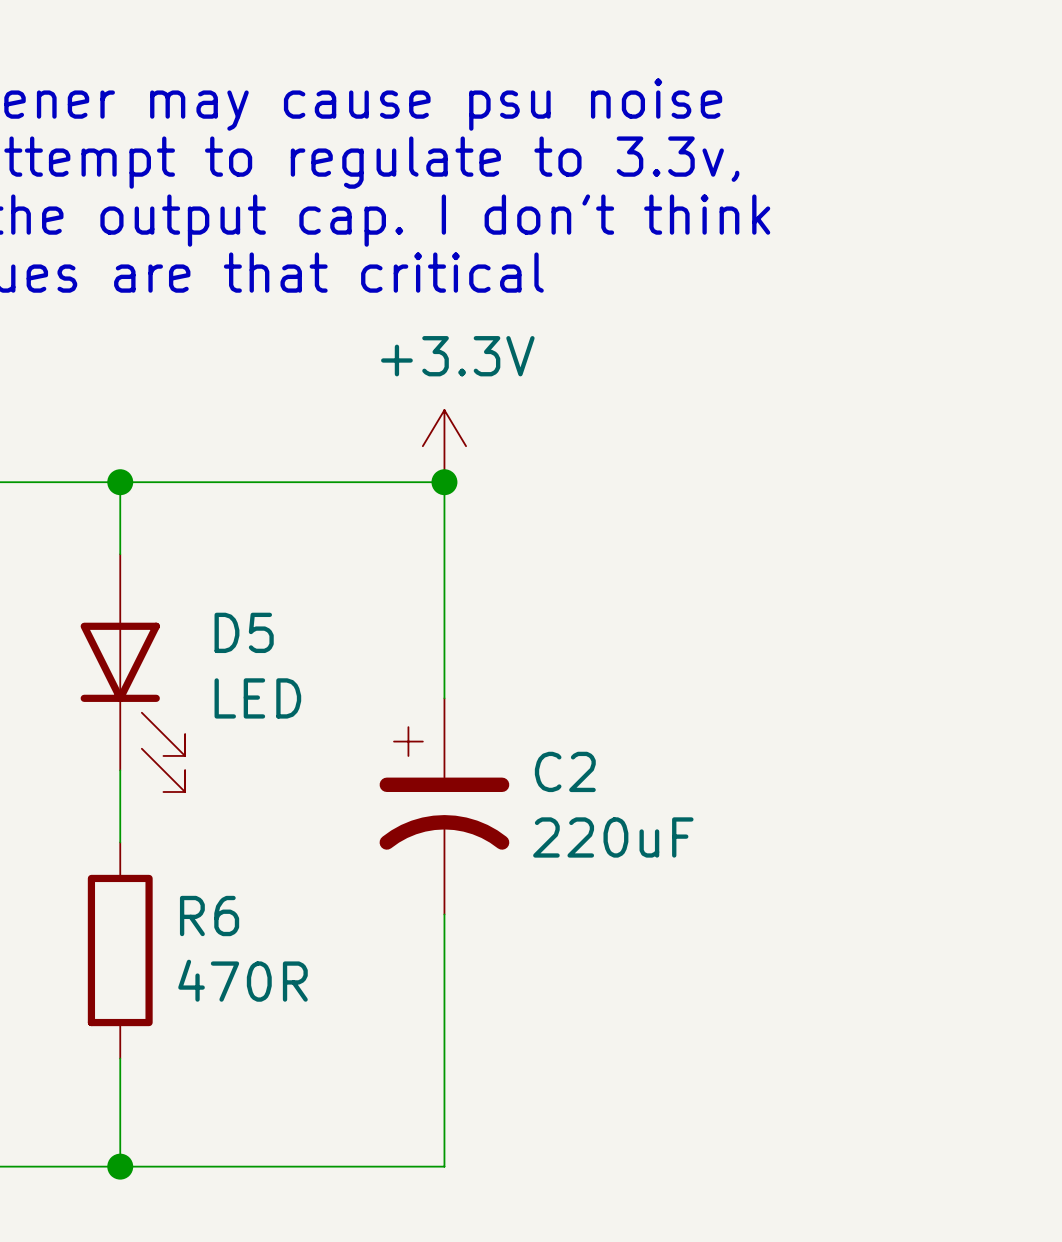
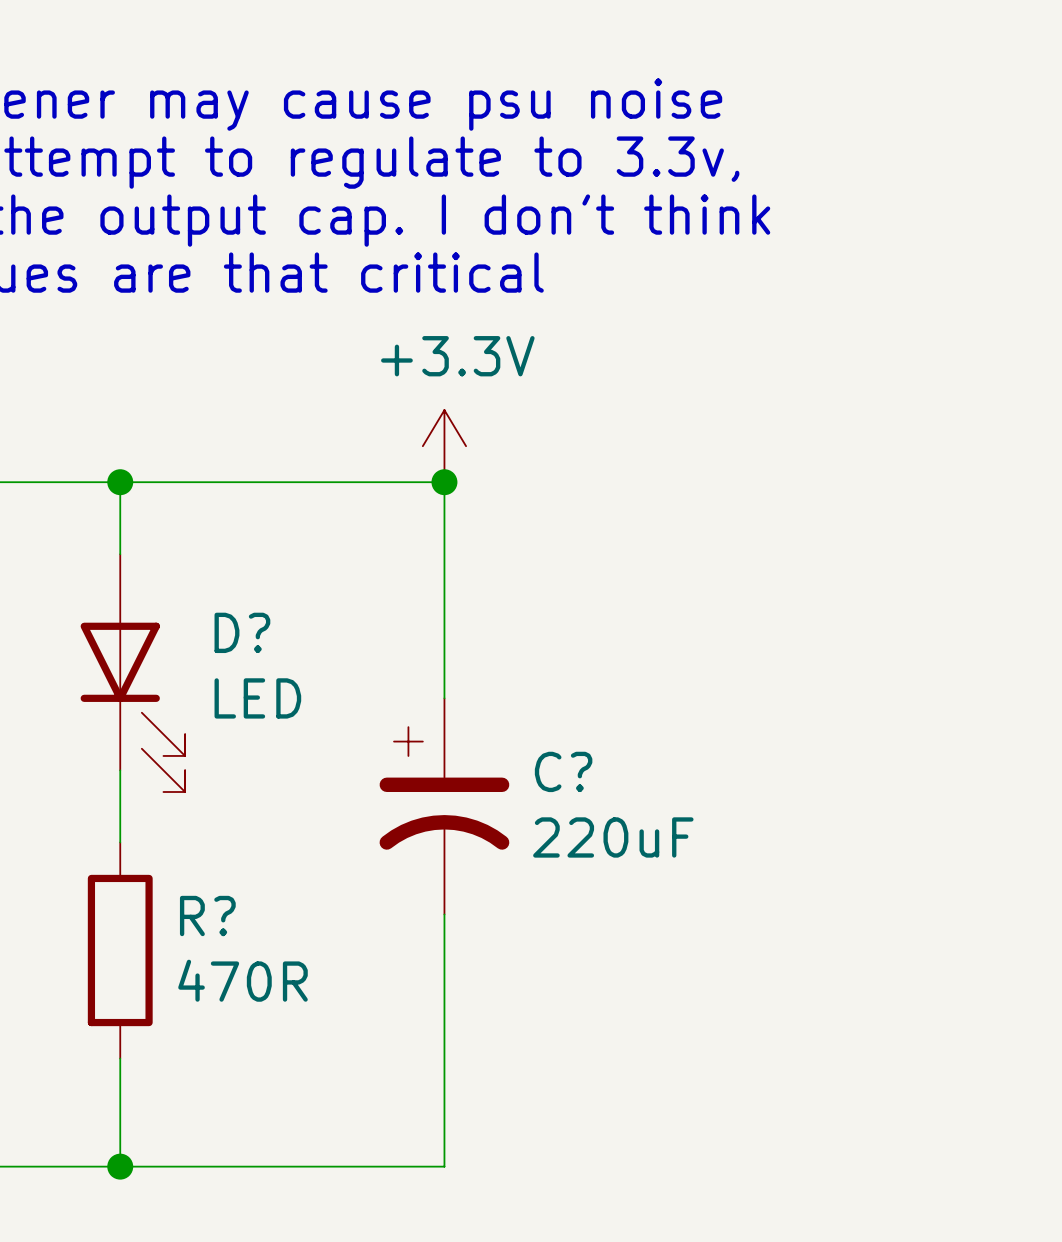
D5 name: D5 (244, 632) -> D? (242, 632)
C2 name: C2 (565, 771) -> C? (563, 771)
R6 name: R6 (209, 916) -> R? (207, 916)

